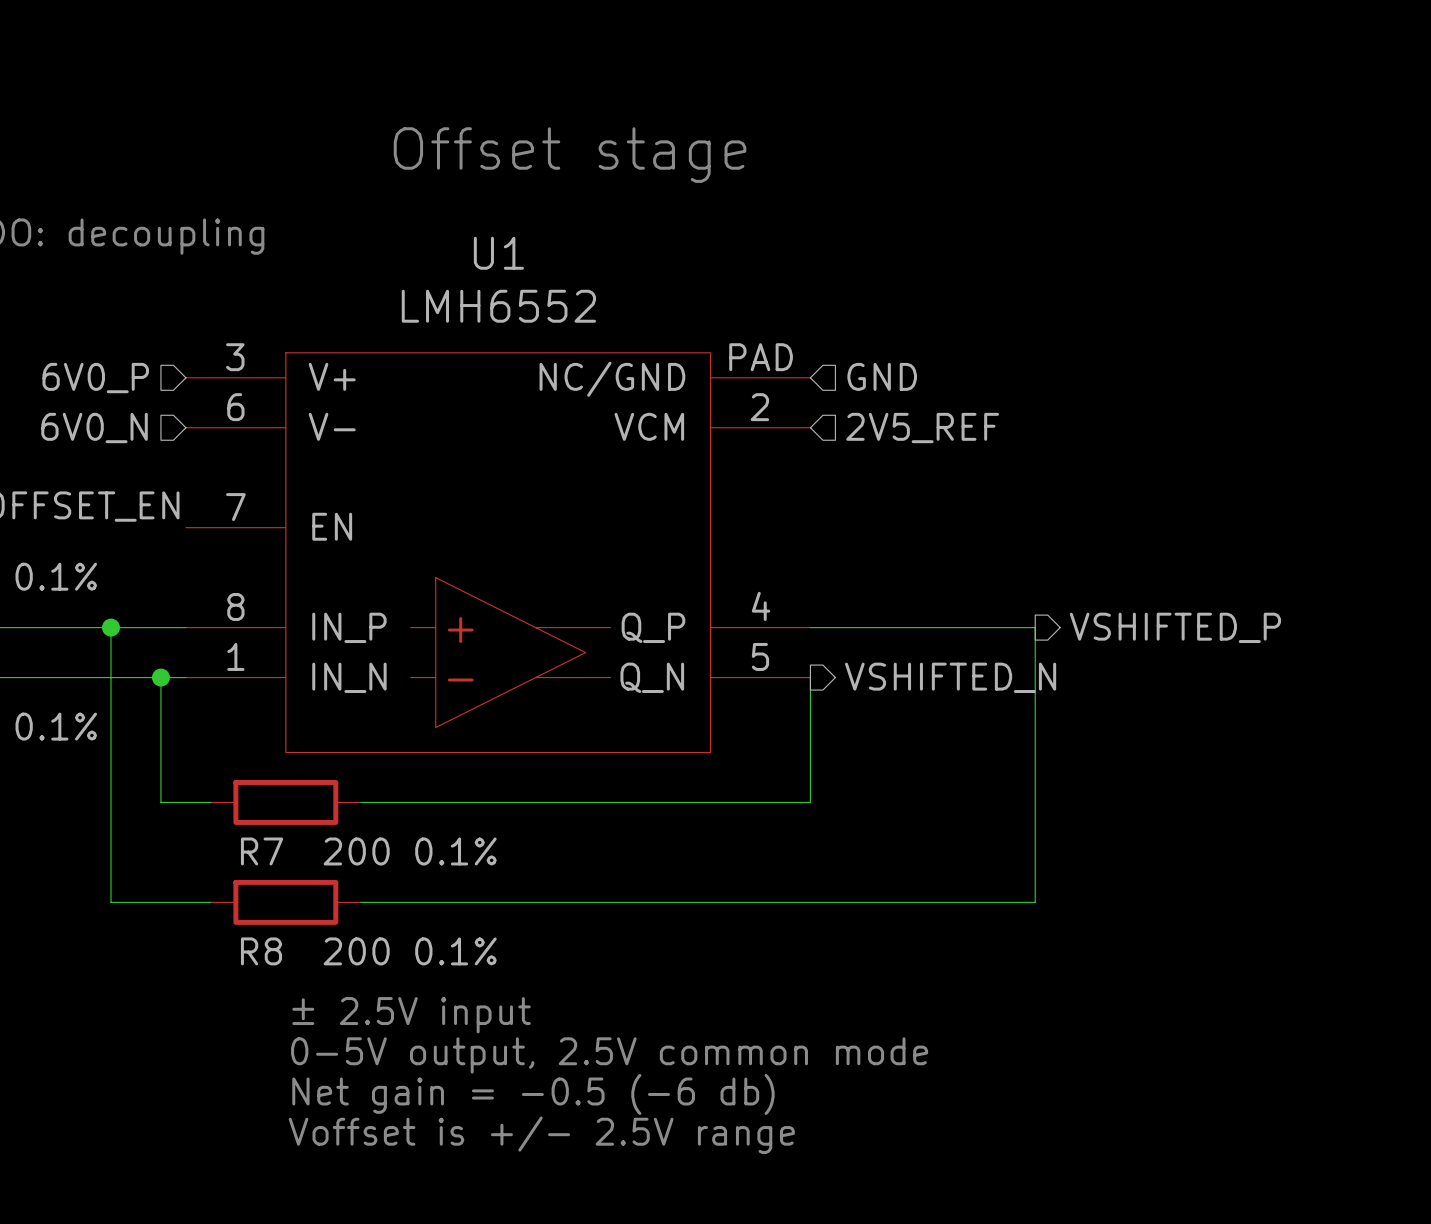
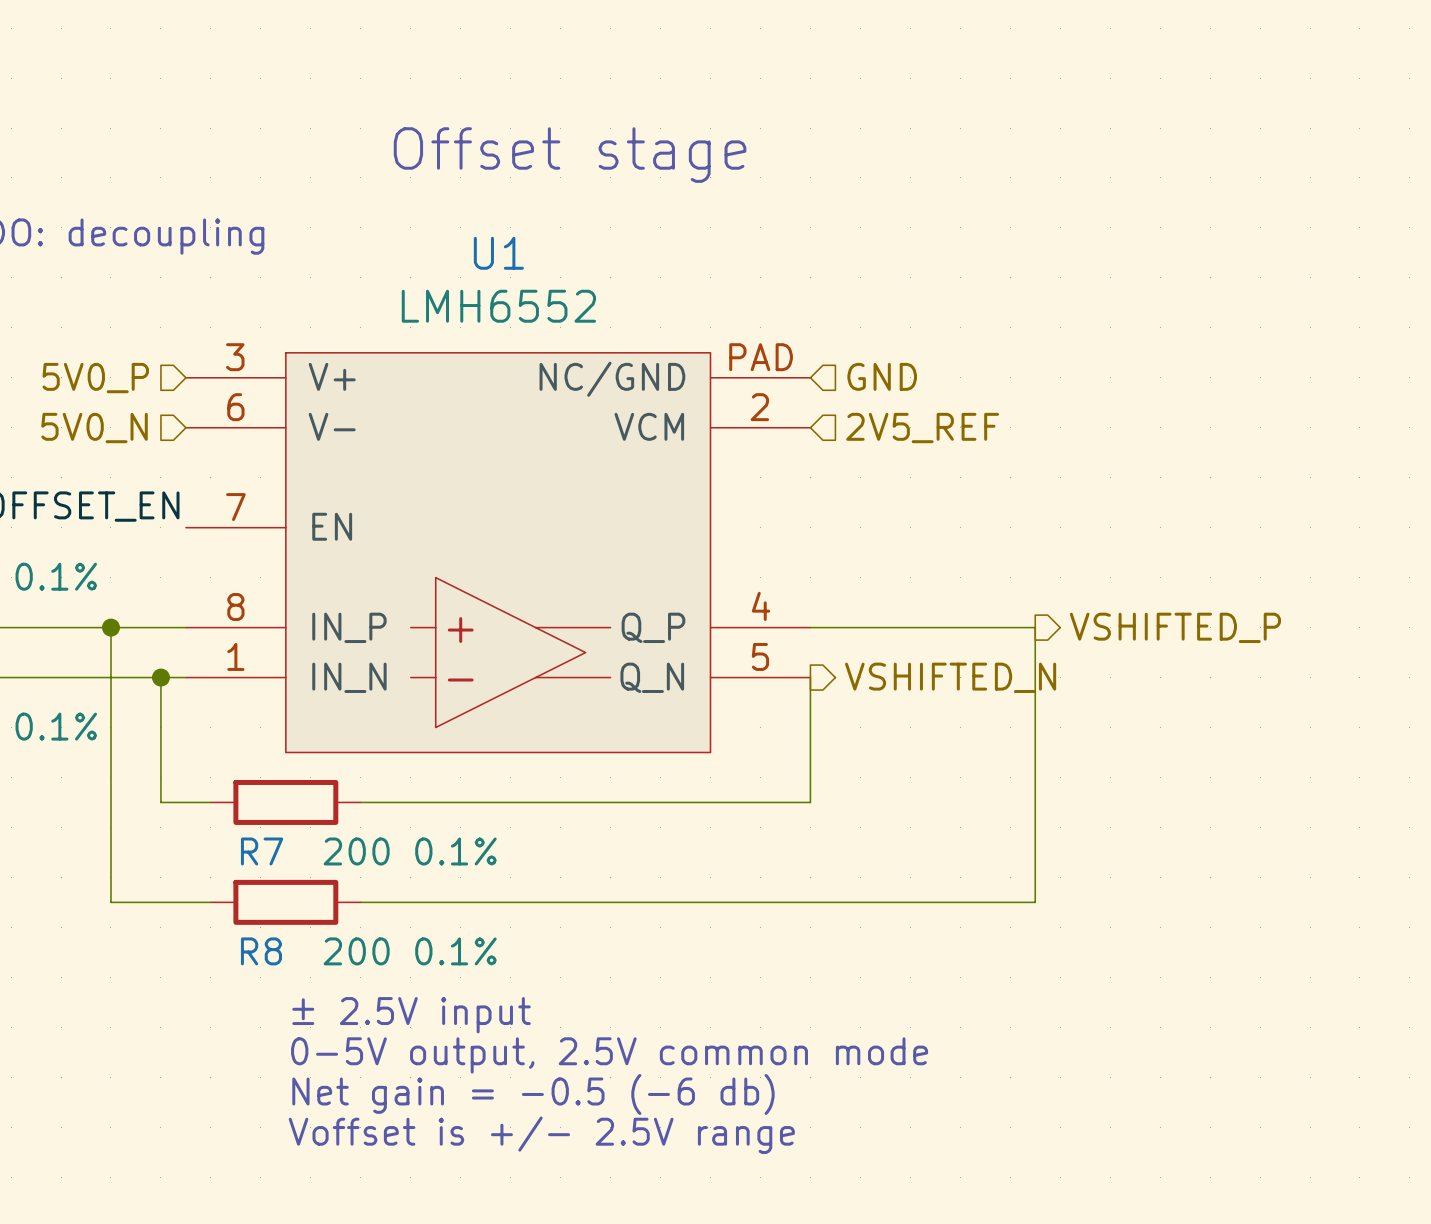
hierarchical label: 6V0_P (95, 378) -> 5V0_P (95, 378)
hierarchical label: 6V0_N (94, 428) -> 5V0_N (94, 428)

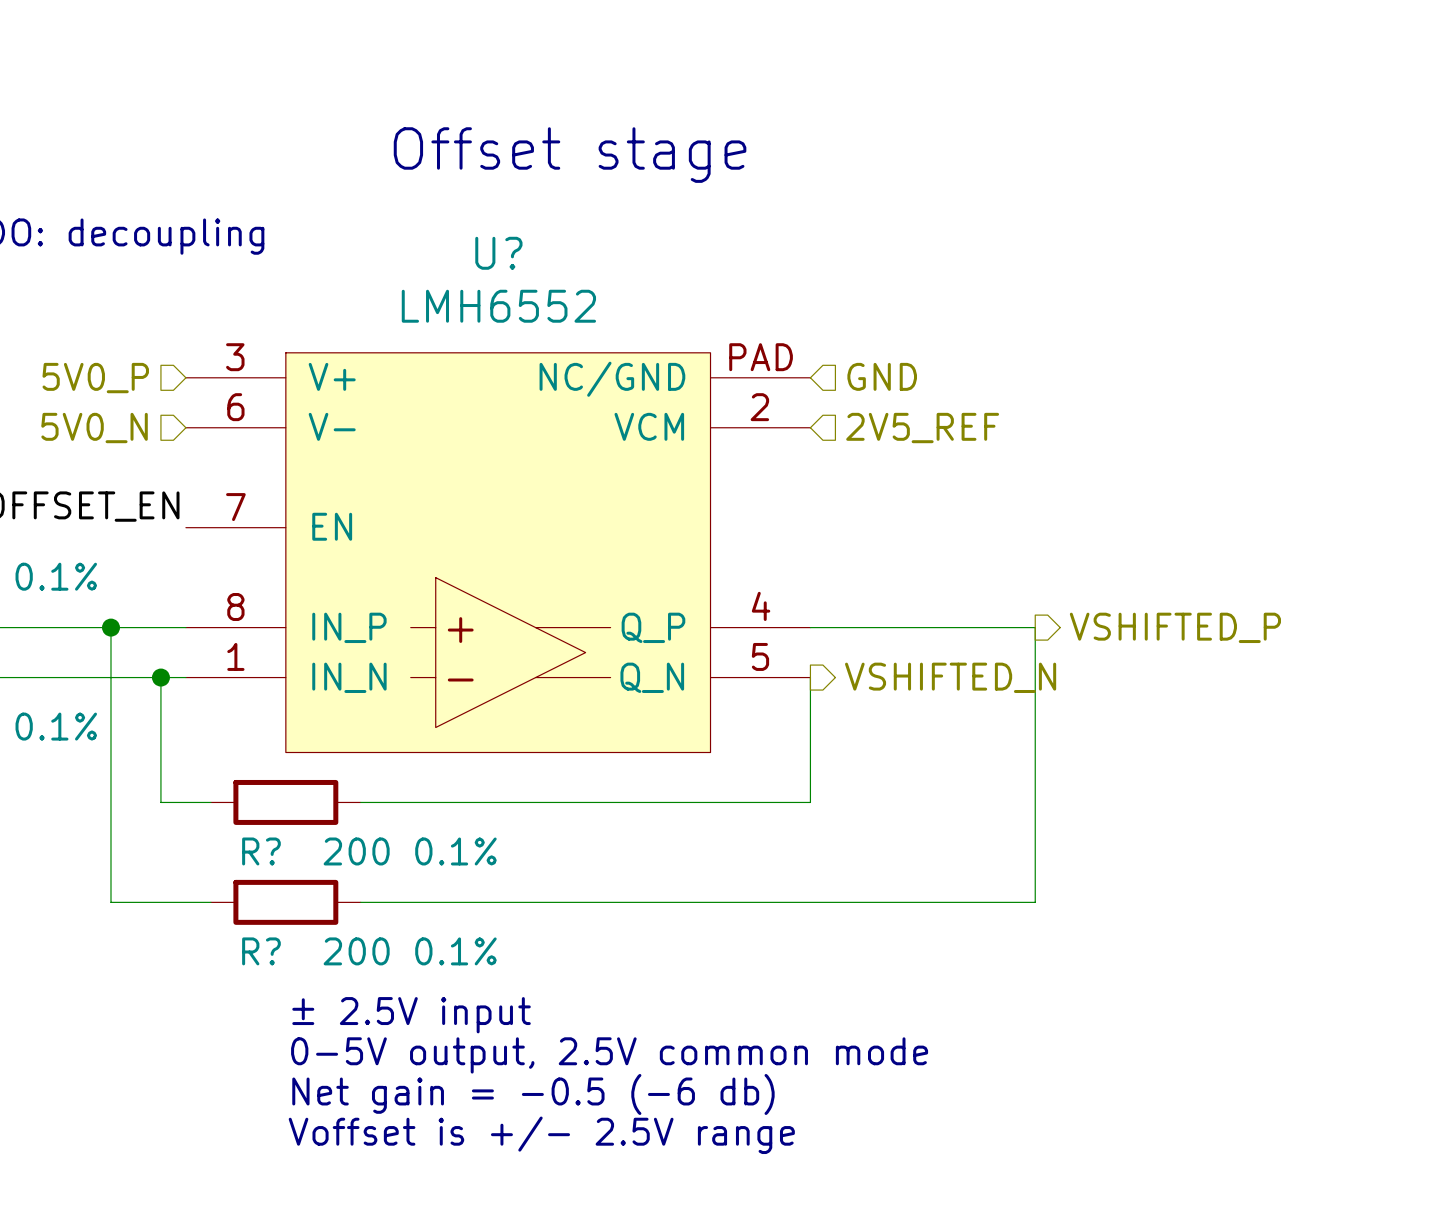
U1 name: U1 (498, 253) -> U? (498, 253)
R7 name: R7 (262, 851) -> R? (261, 851)
R8 name: R8 (261, 951) -> R? (261, 951)

